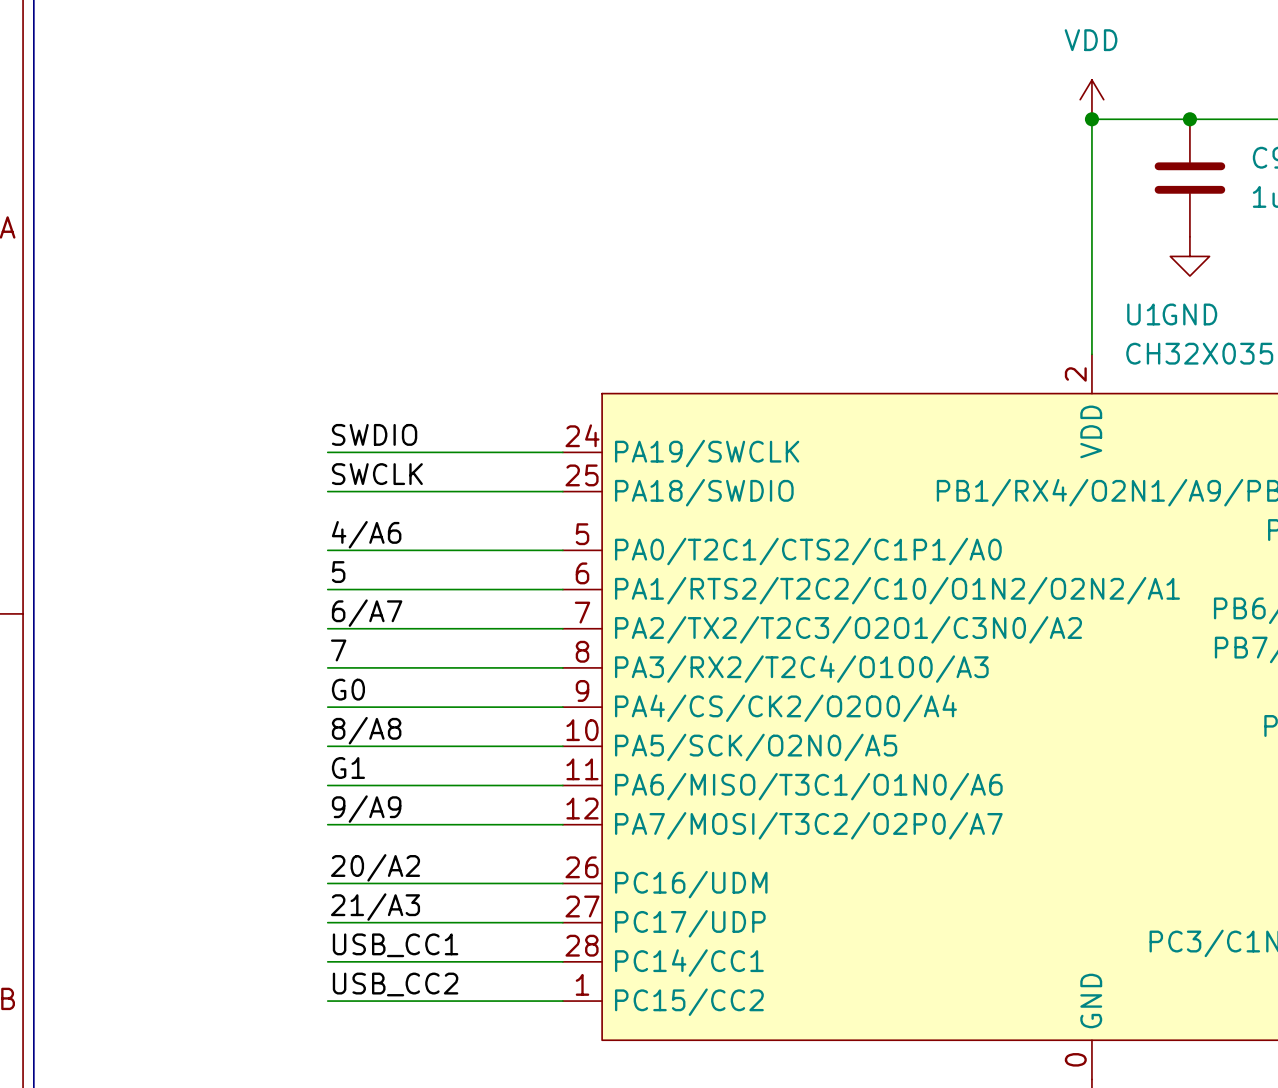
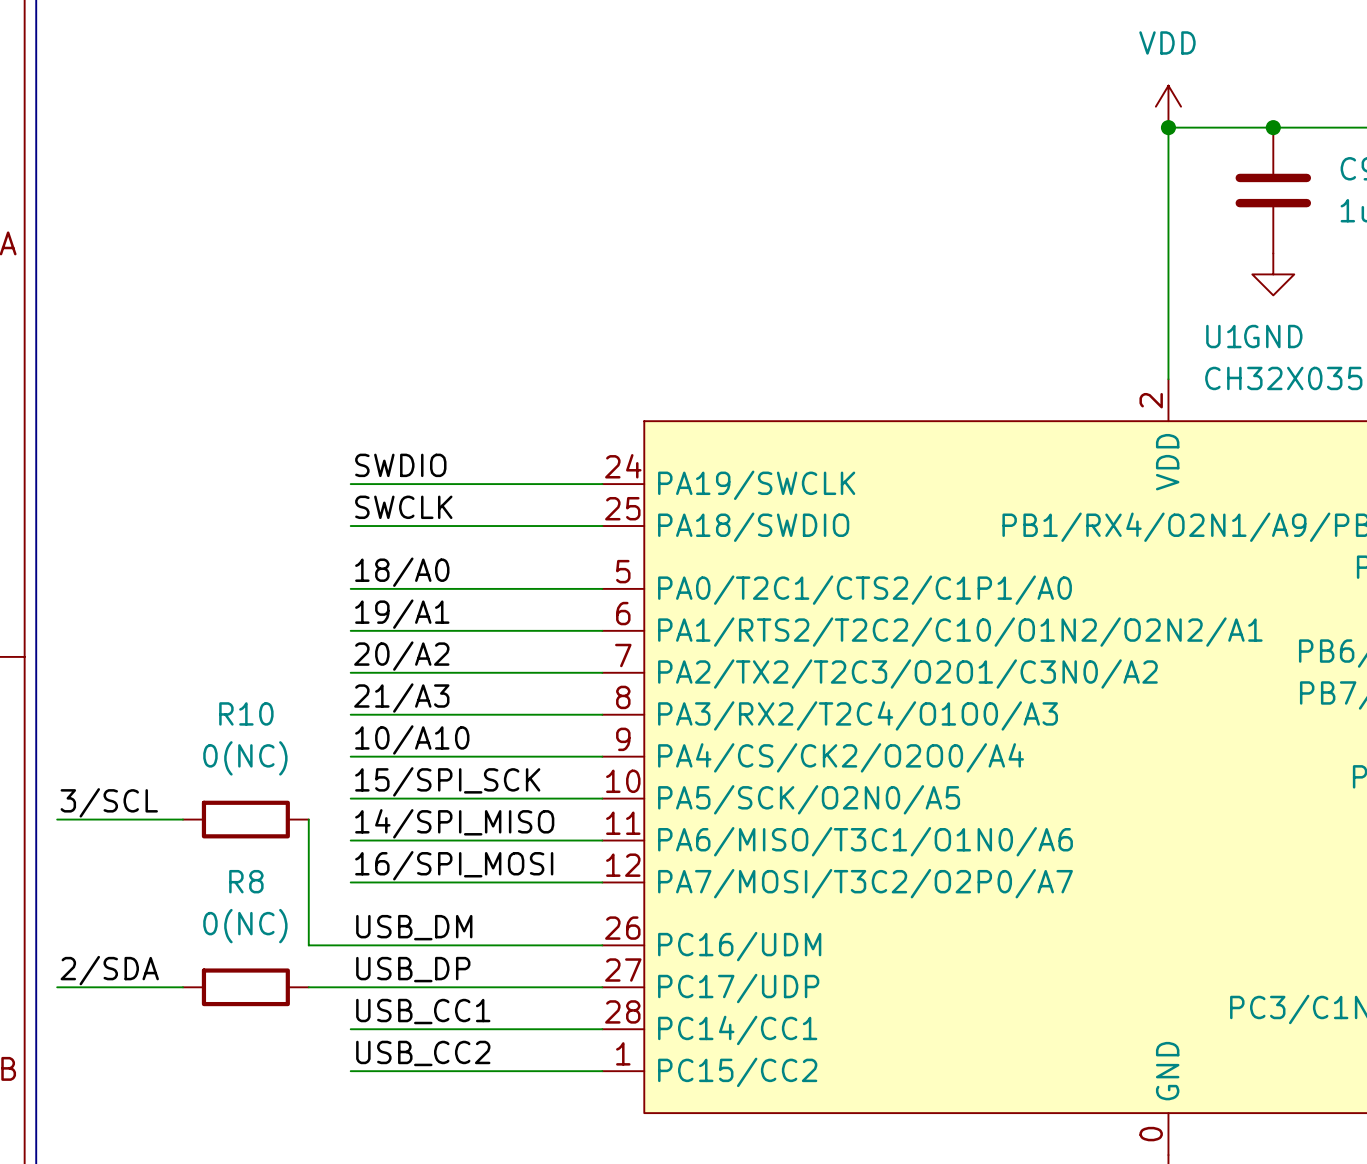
label: 4/A6 (366, 534) -> 18/A0 (402, 572)
label: 5 (338, 572) -> 19/A1 (402, 614)
label: 6/A7 (367, 613) -> 20/A2 (401, 656)
label: 7 (338, 650) -> 21/A3 (401, 698)
label: G0 (348, 689) -> 10/A10 (412, 739)
label: 8/A8 (366, 730) -> 15/SPI_SCK (447, 781)
label: none -> 3/SCL (109, 802)
wire: none -> (57, 819) (182, 819)
R10: none -> 0(NC) (245, 819)
wire: none -> (308, 819) (308, 945) (350, 945)
label: G1 (348, 768) -> 14/SPI_MISO (454, 823)
label: 9/A9 (366, 809) -> 16/SPI_MOSI (454, 865)
label: 20/A2 (375, 867) -> USB_DM (414, 927)
label: none -> 2/SDA (109, 970)
label: 21/A3 (375, 907) -> USB_DP (413, 969)
wire: none -> (57, 987) (182, 987)
R8: none -> 0(NC) (245, 987)
wire: none -> (308, 987) (350, 987)

